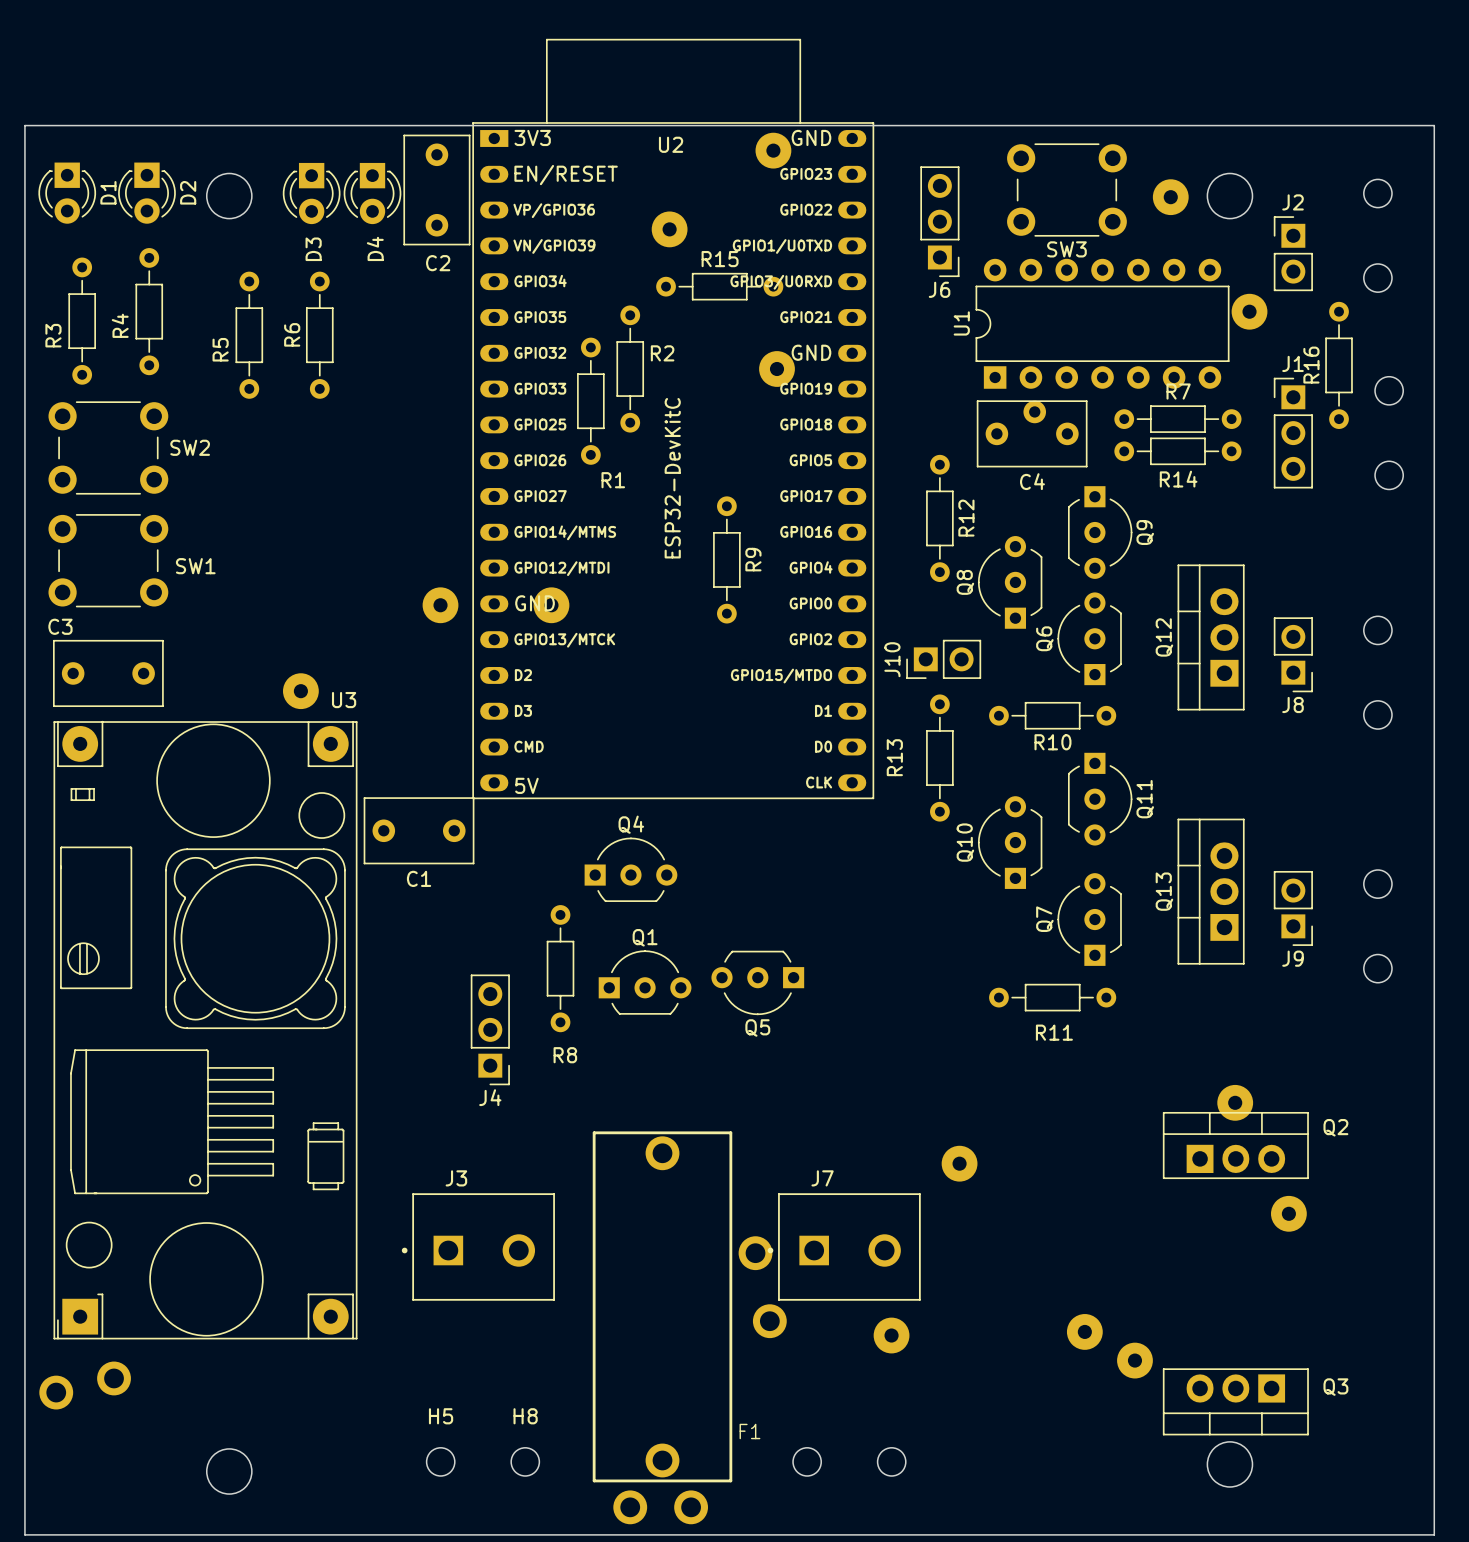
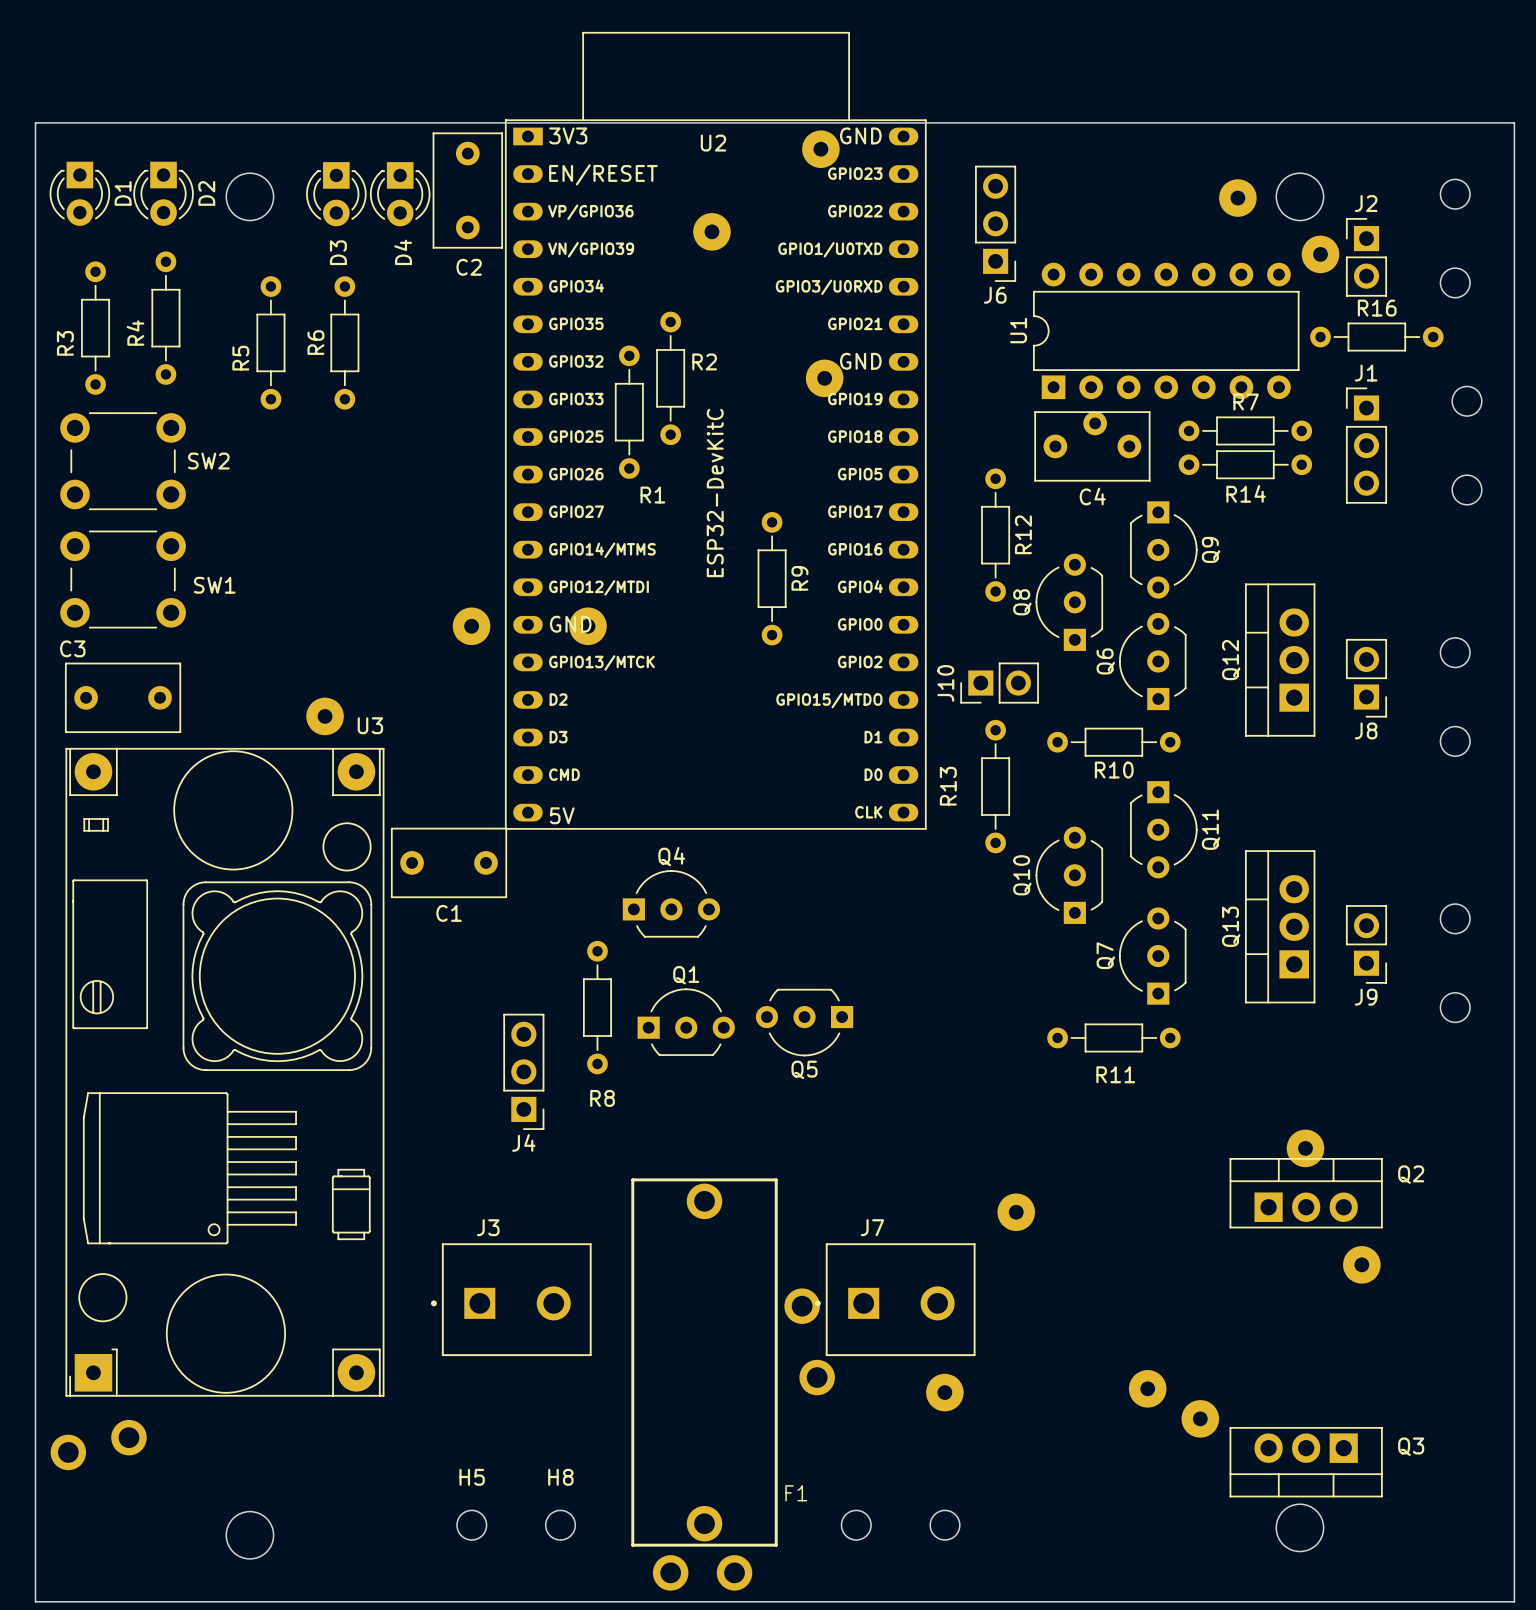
SW3: (1066, 190) -> none
R15: (719, 286) -> none
part position: (1249, 311) -> (1320, 254)
R16 rotation: 0° (1339, 365) -> 90° clockwise (1376, 337)

